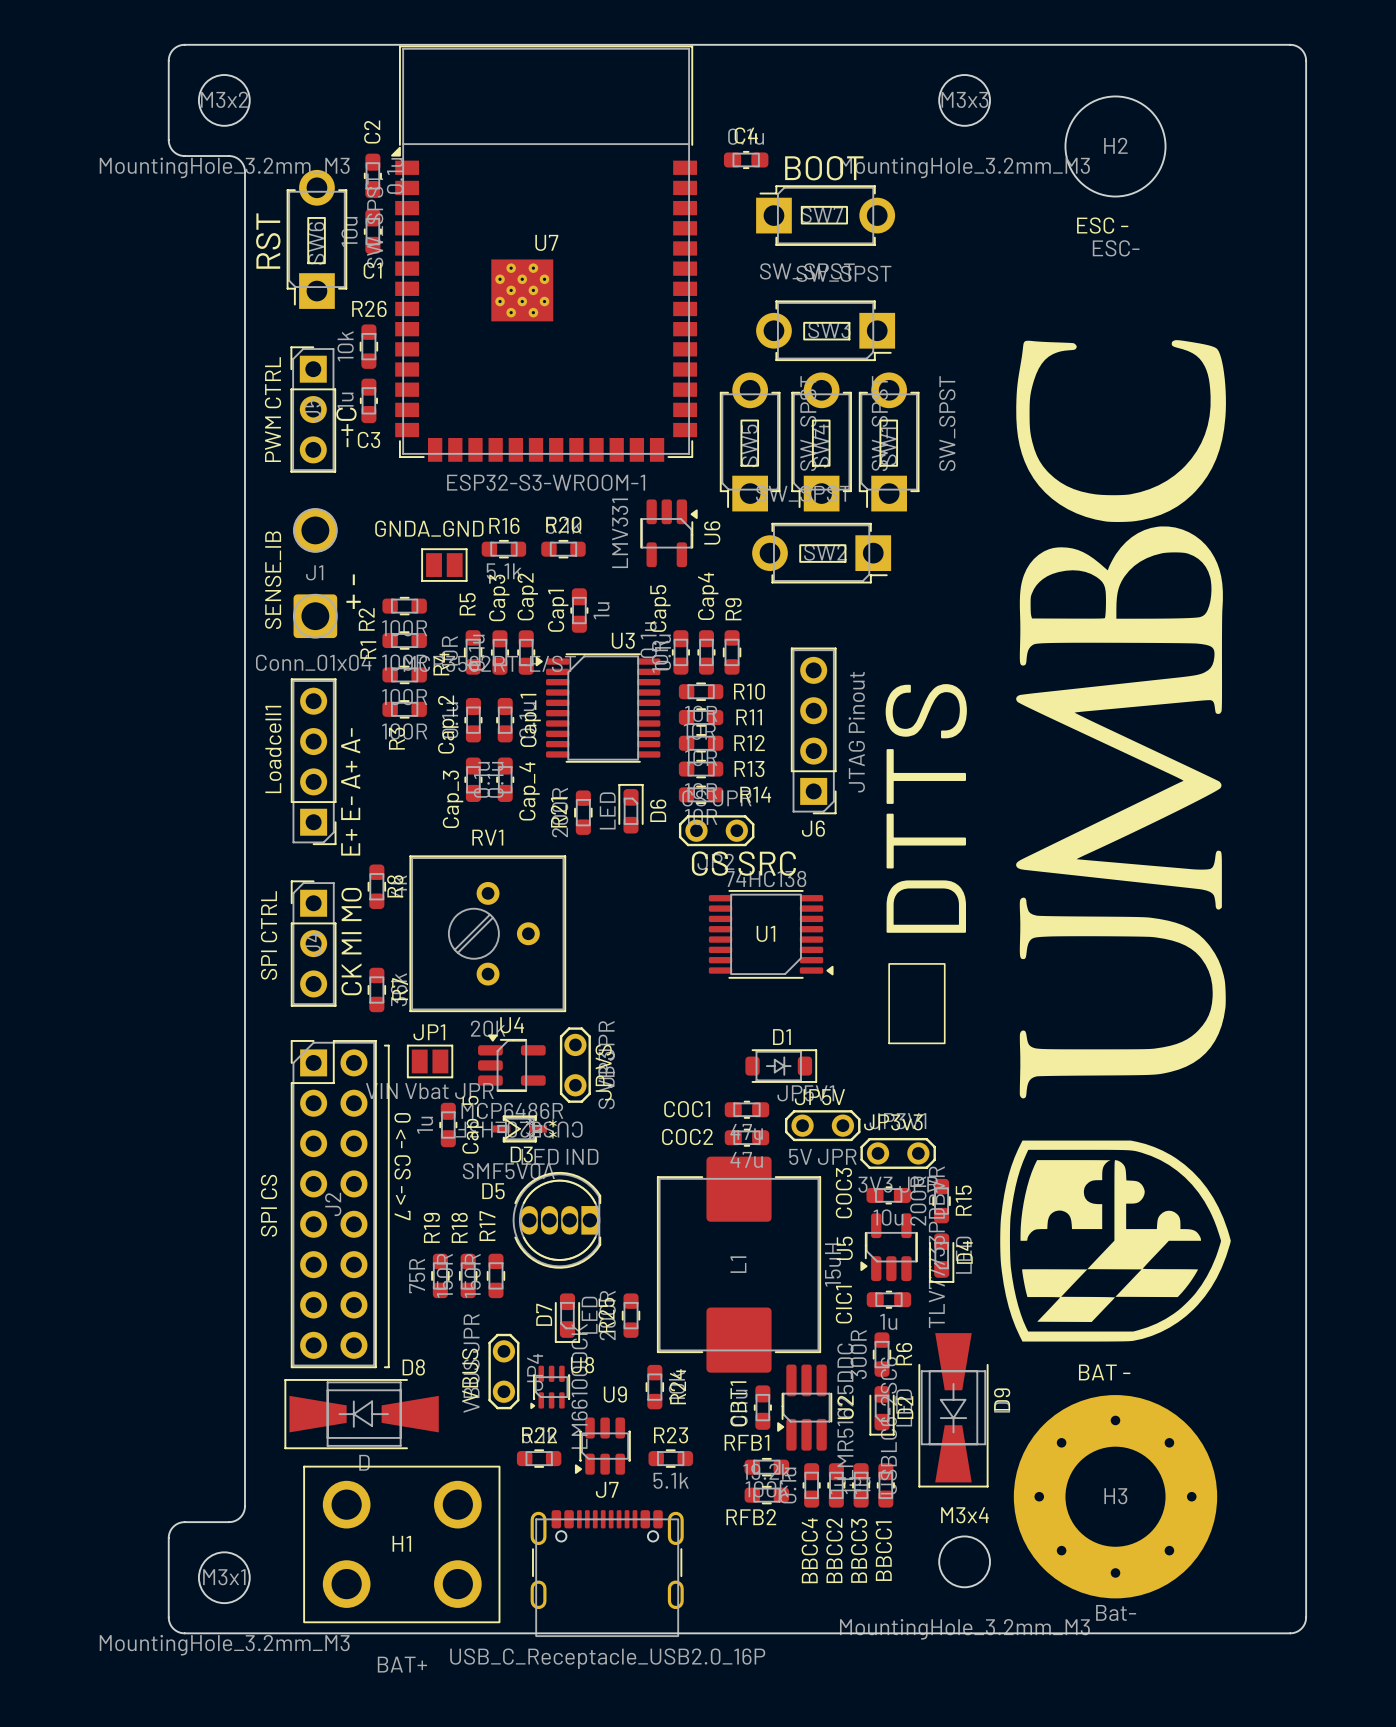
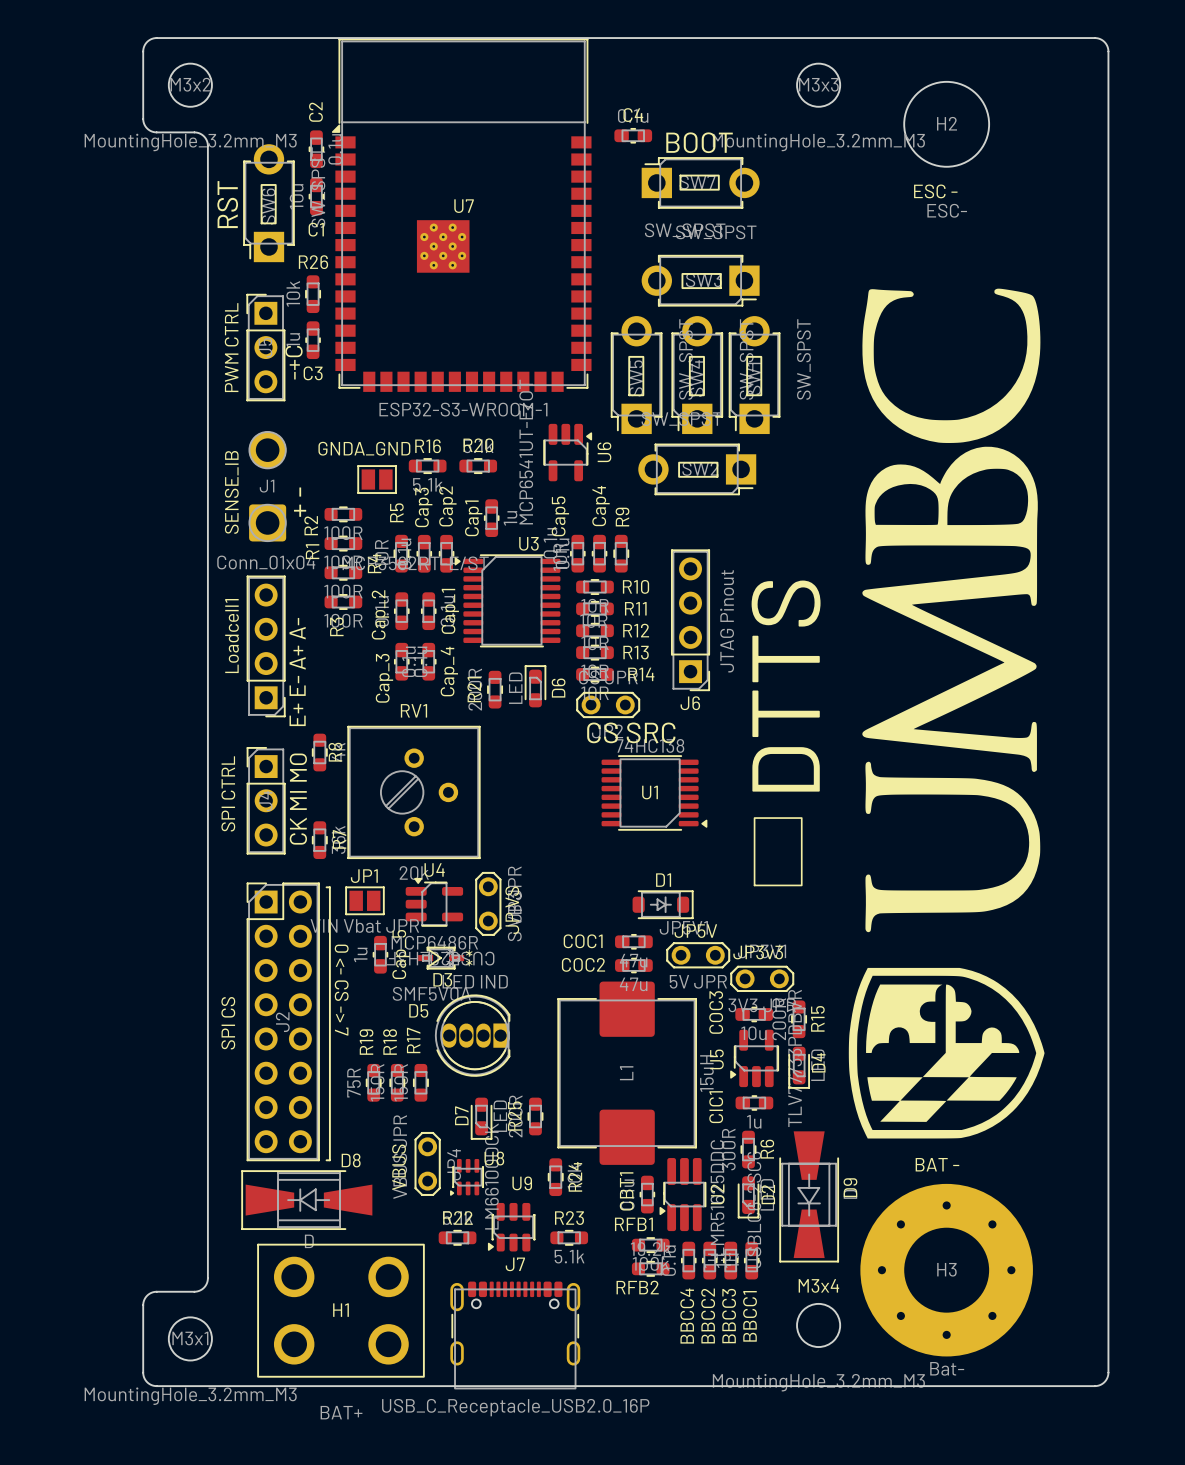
U6 value: LMV331 (620, 533) -> MCP6541UT-E/OT (526, 452)

